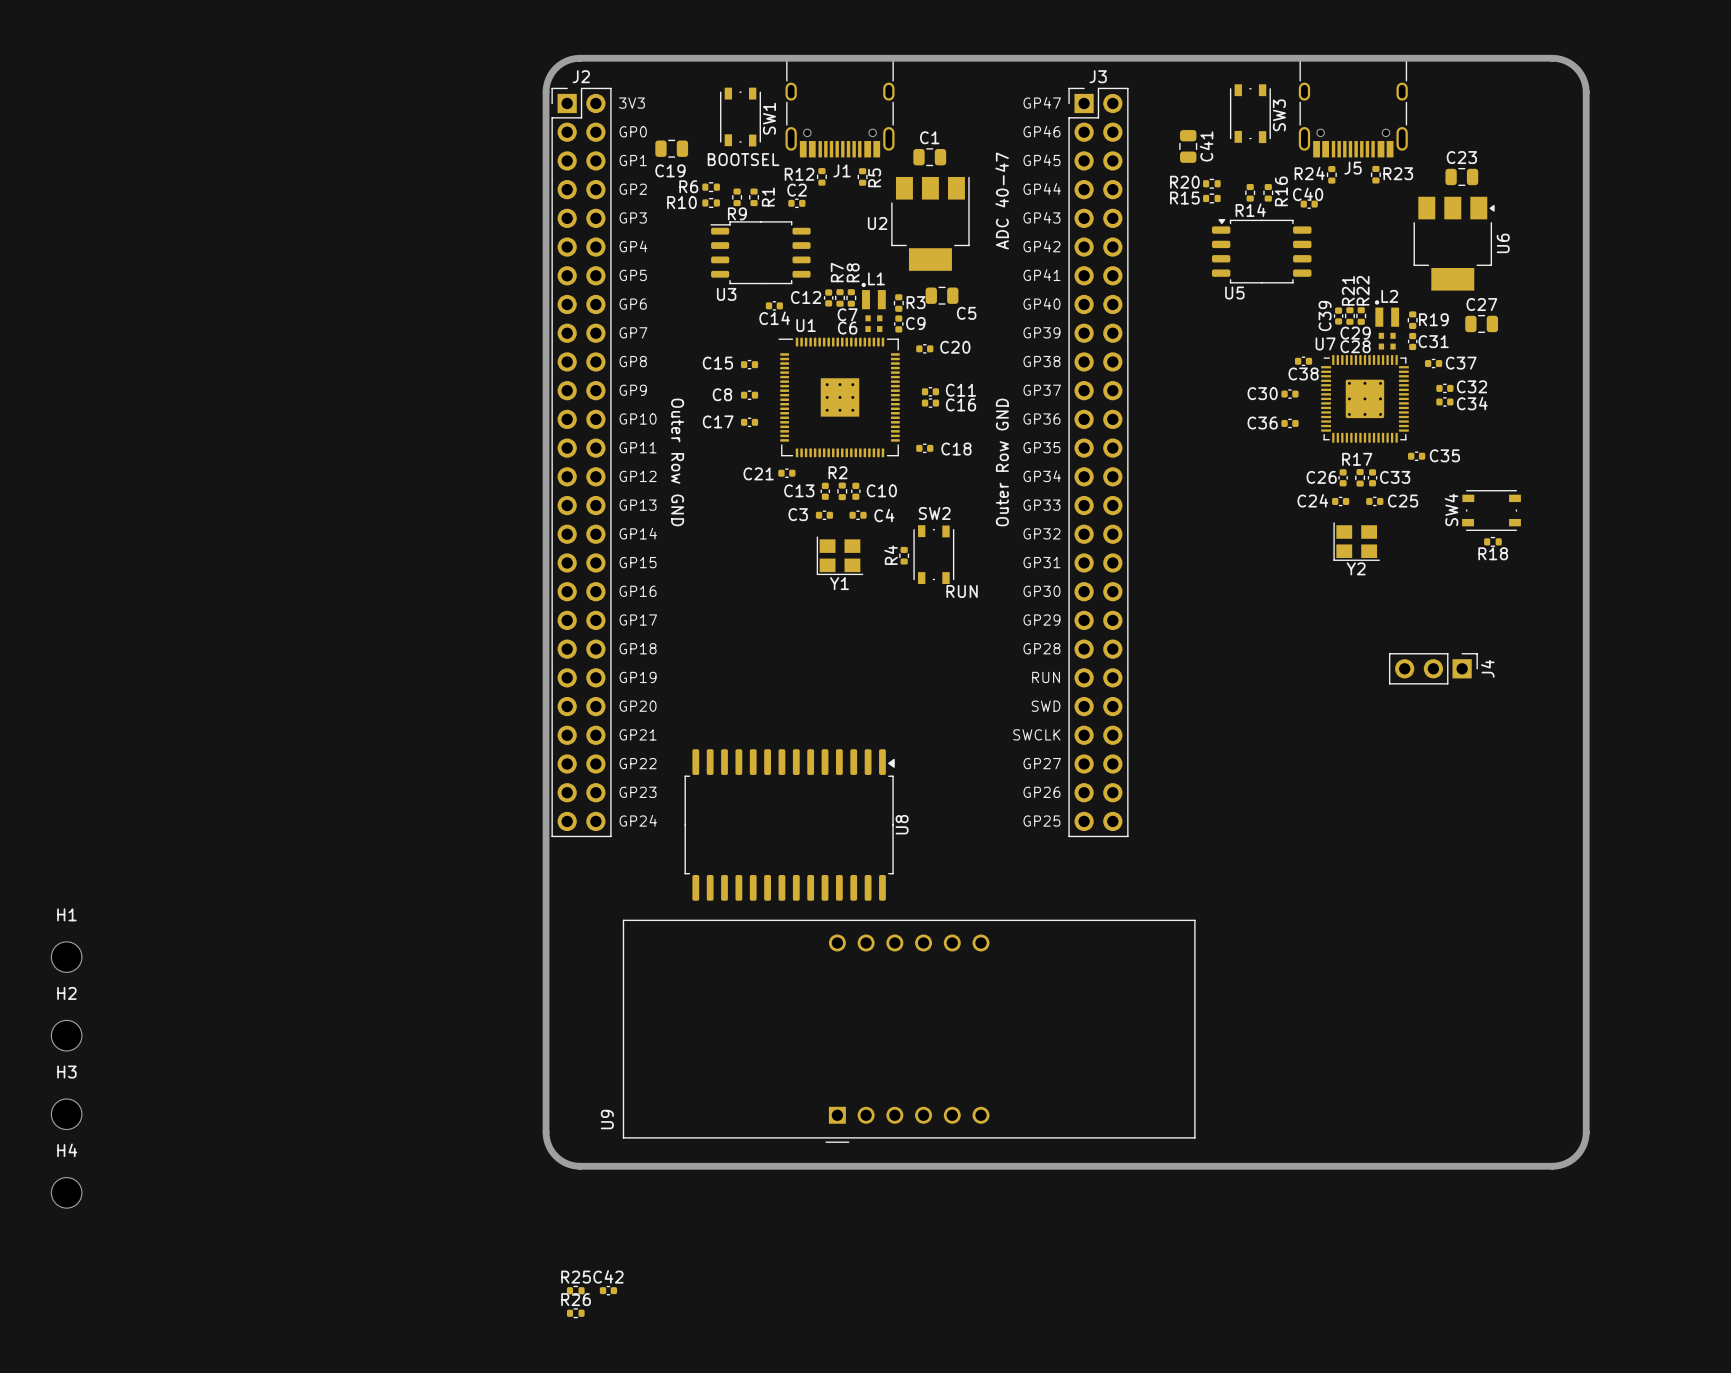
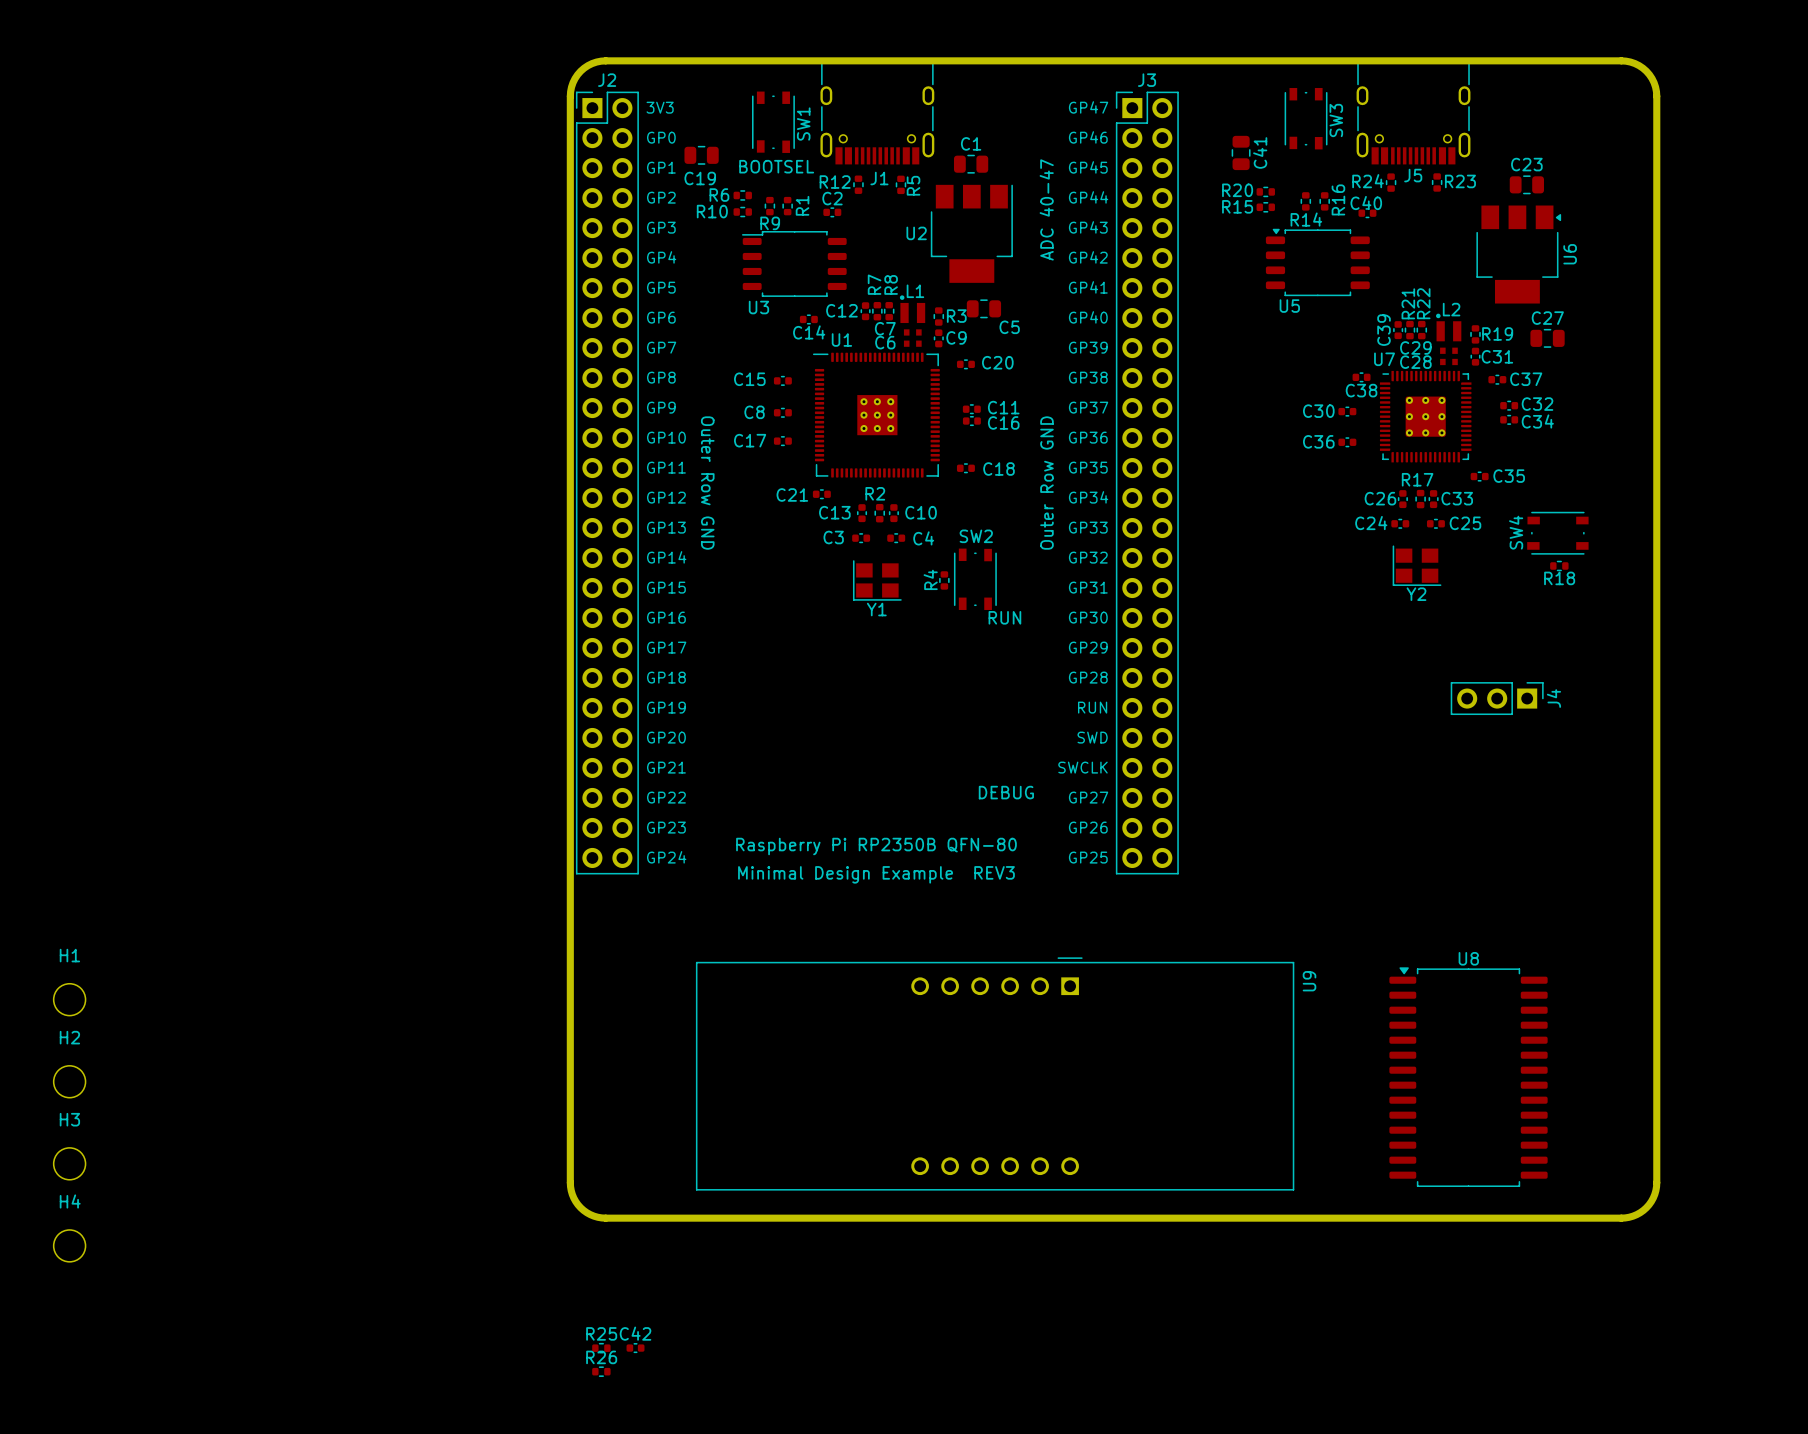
text: none -> DEBUG (1006, 792)
text: none -> Raspberry Pi RP2350B QFN-80 (876, 846)
U8 rotation: 0° (789, 824) -> 90° counterclockwise (1468, 1077)
U8 position: (789, 824) -> (1468, 1077)
text: none -> Minimal Design Example REV3 (876, 874)
U9 rotation: 0° (909, 1031) -> 180° (995, 1073)

